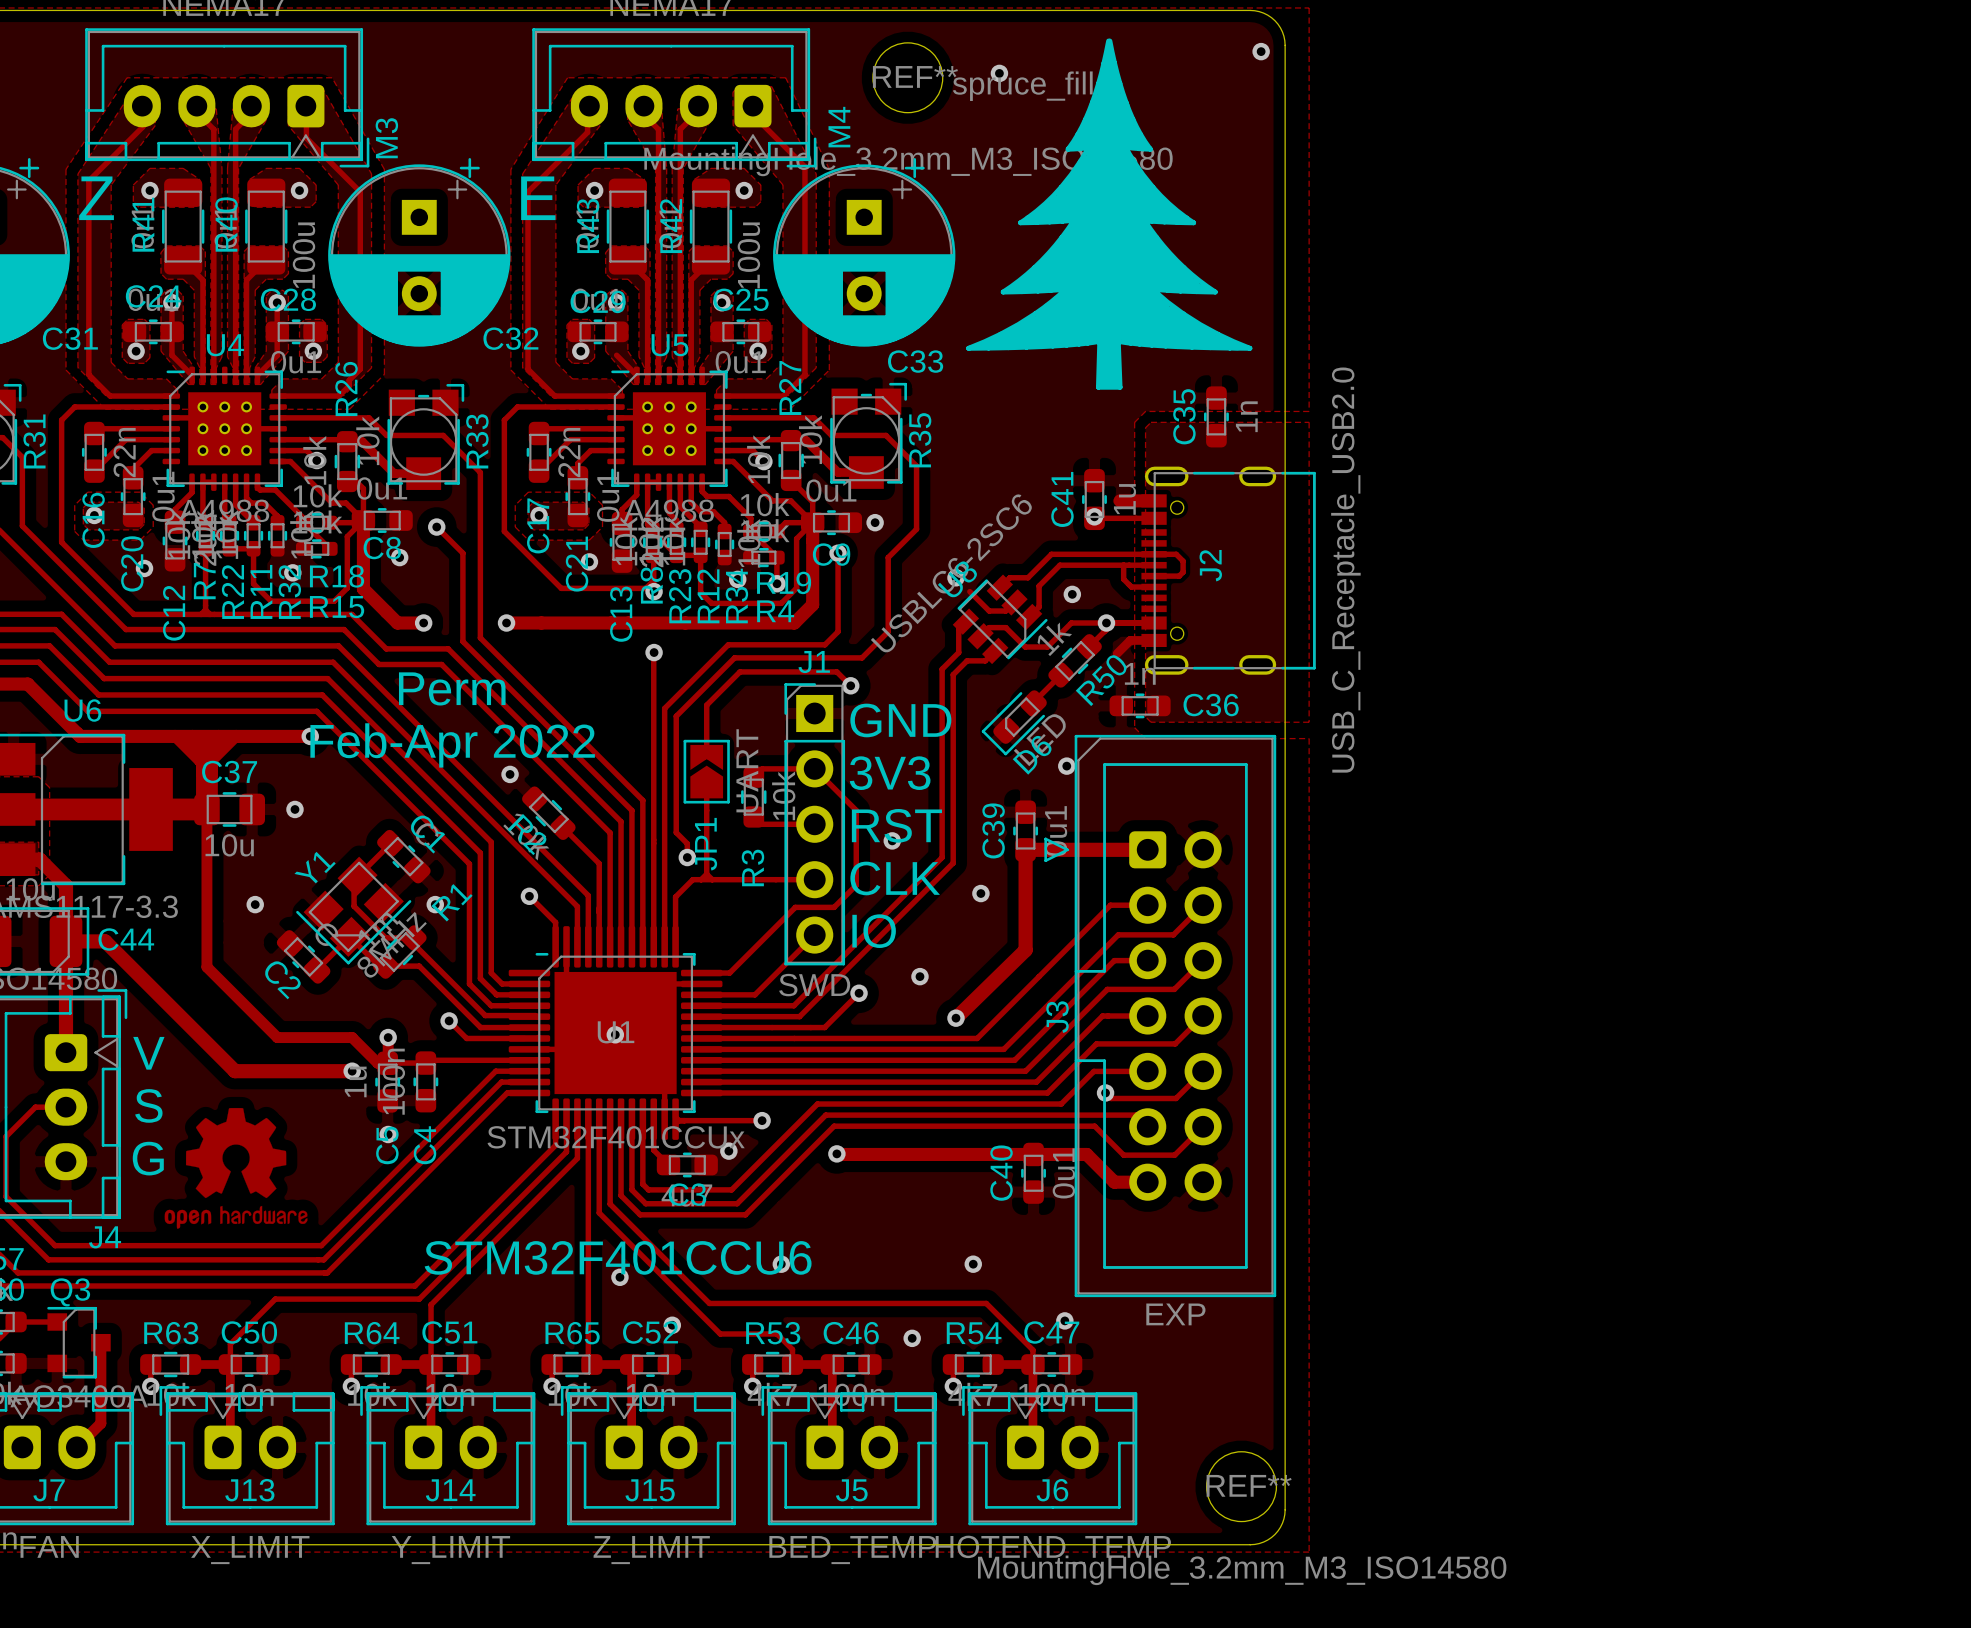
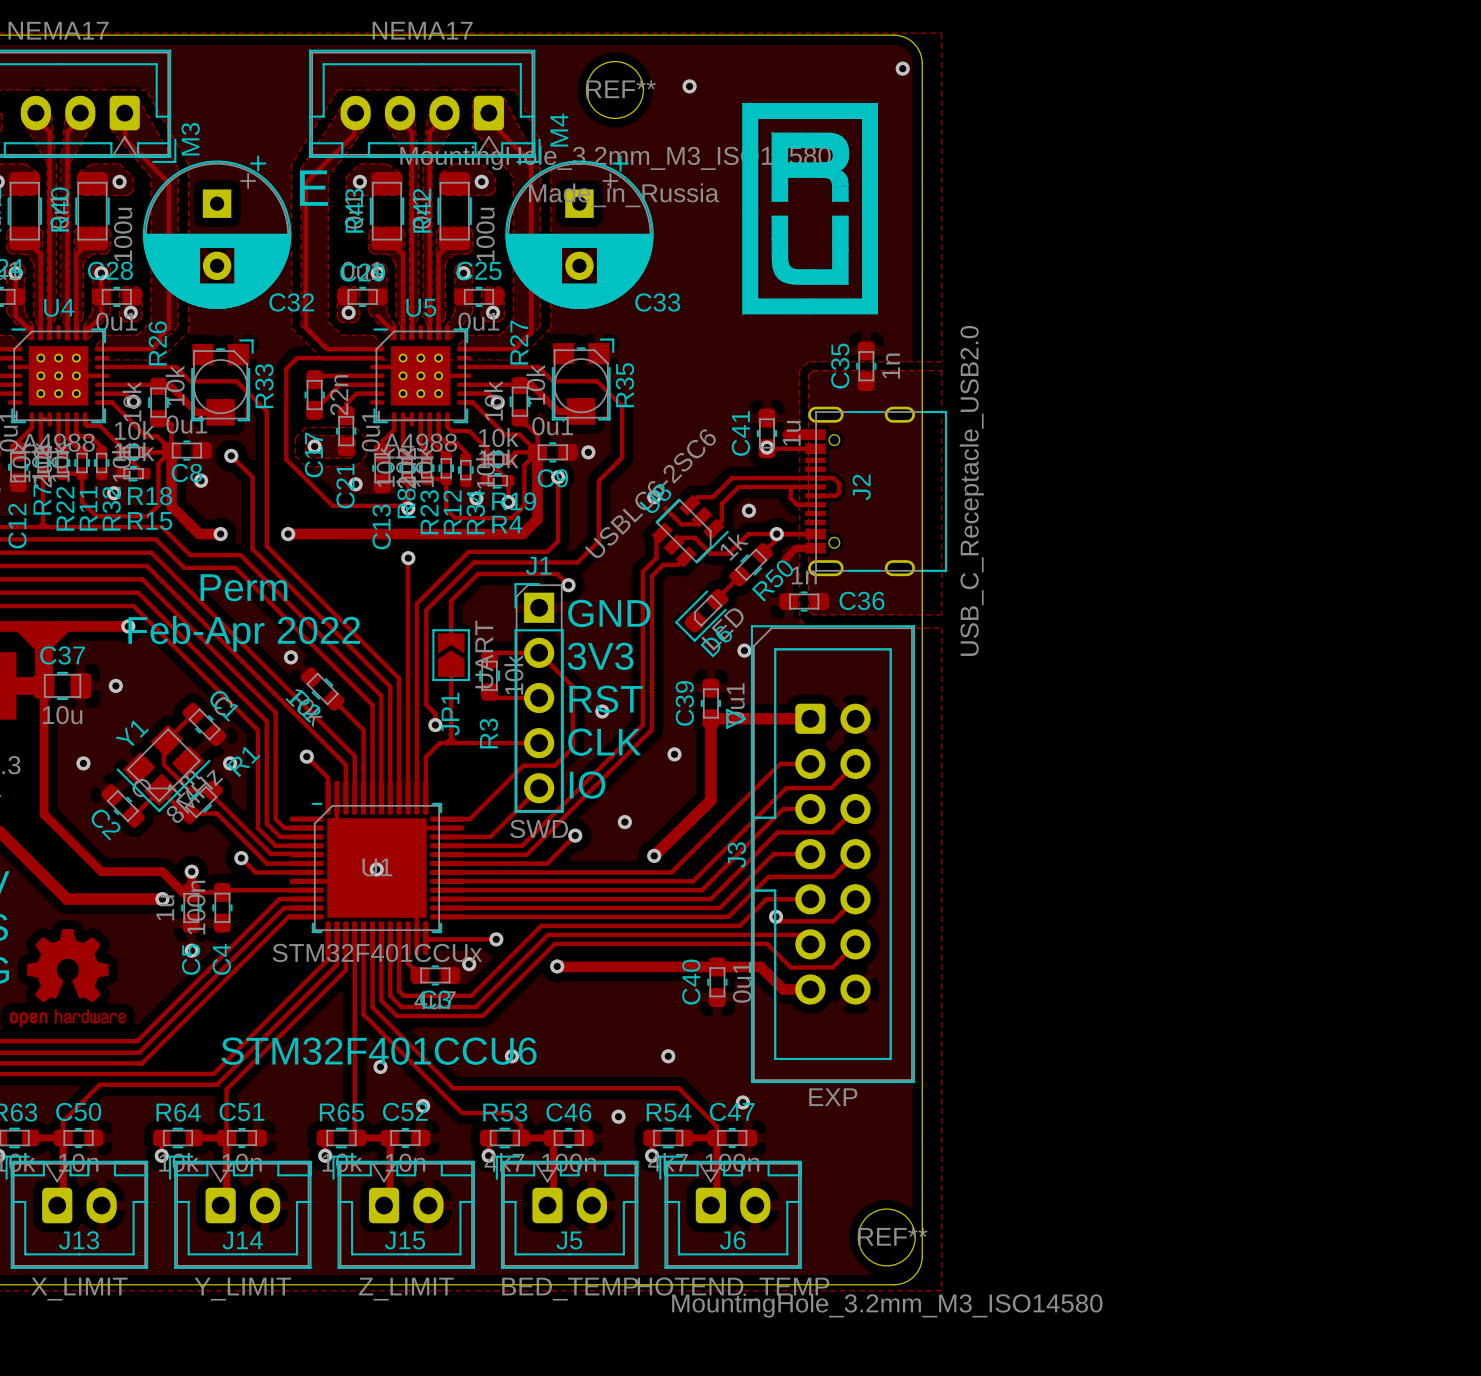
drawing: [966, 38, 1253, 390] -> none
drawing: none -> [742, 103, 878, 314]
C33 name position: C33 (915, 361) -> C33 (657, 302)

